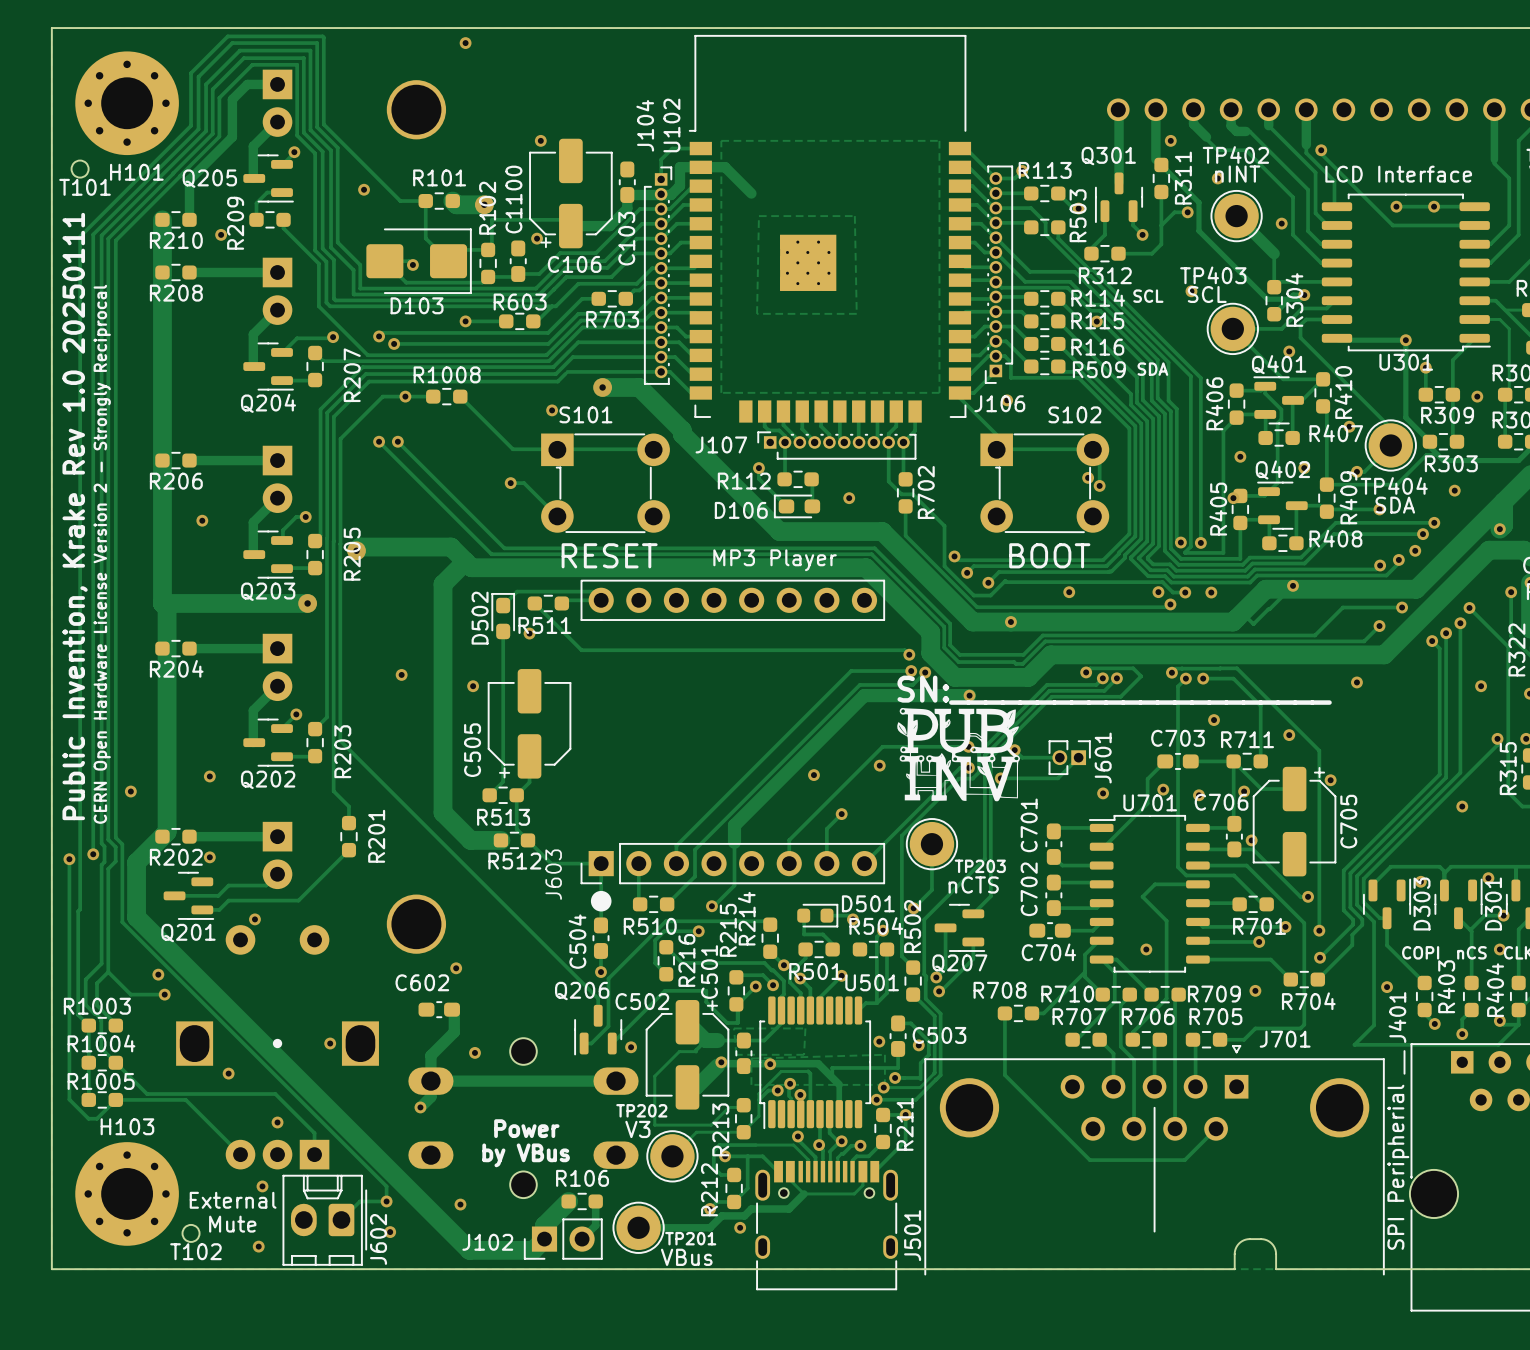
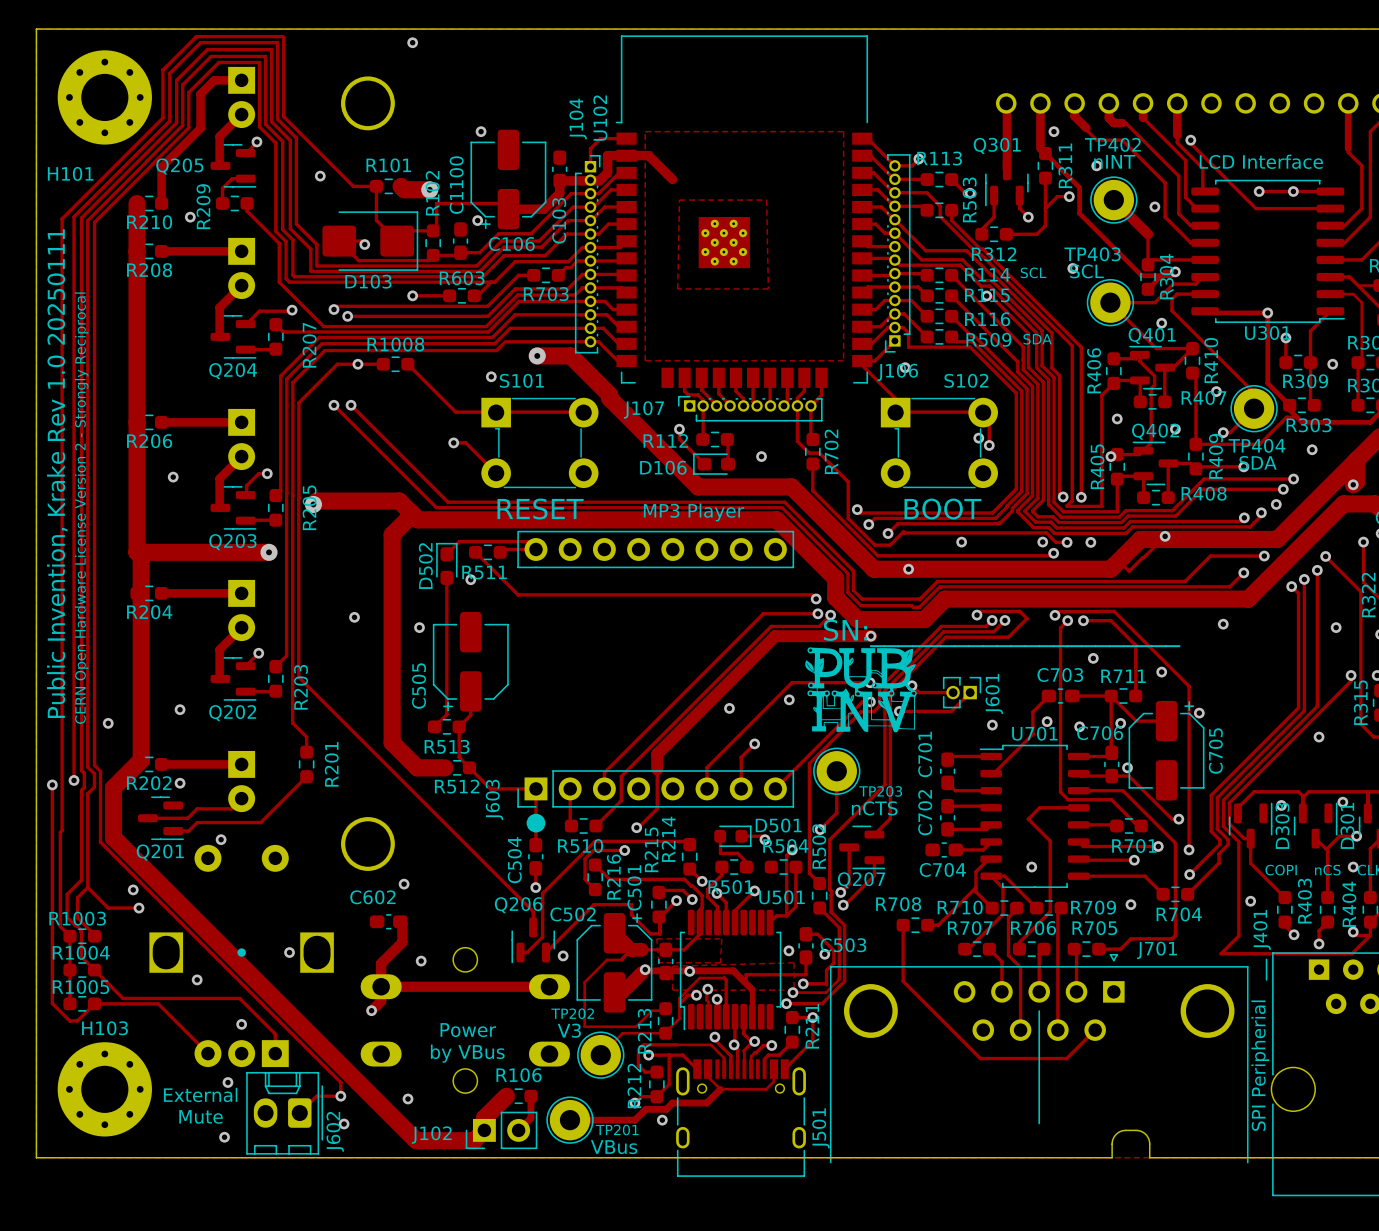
T101: (80, 169) -> none
H101 name position: H101 (136, 172) -> H101 (70, 173)
T102: (191, 1233) -> none

